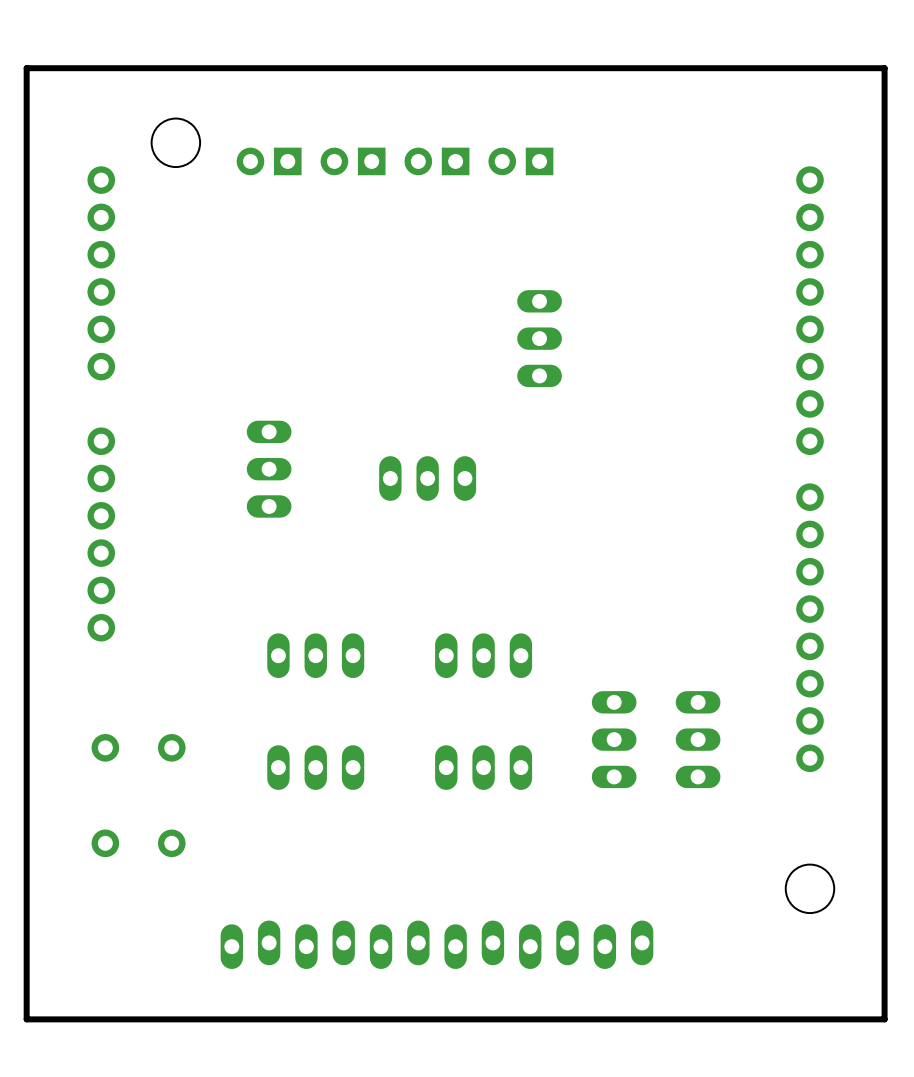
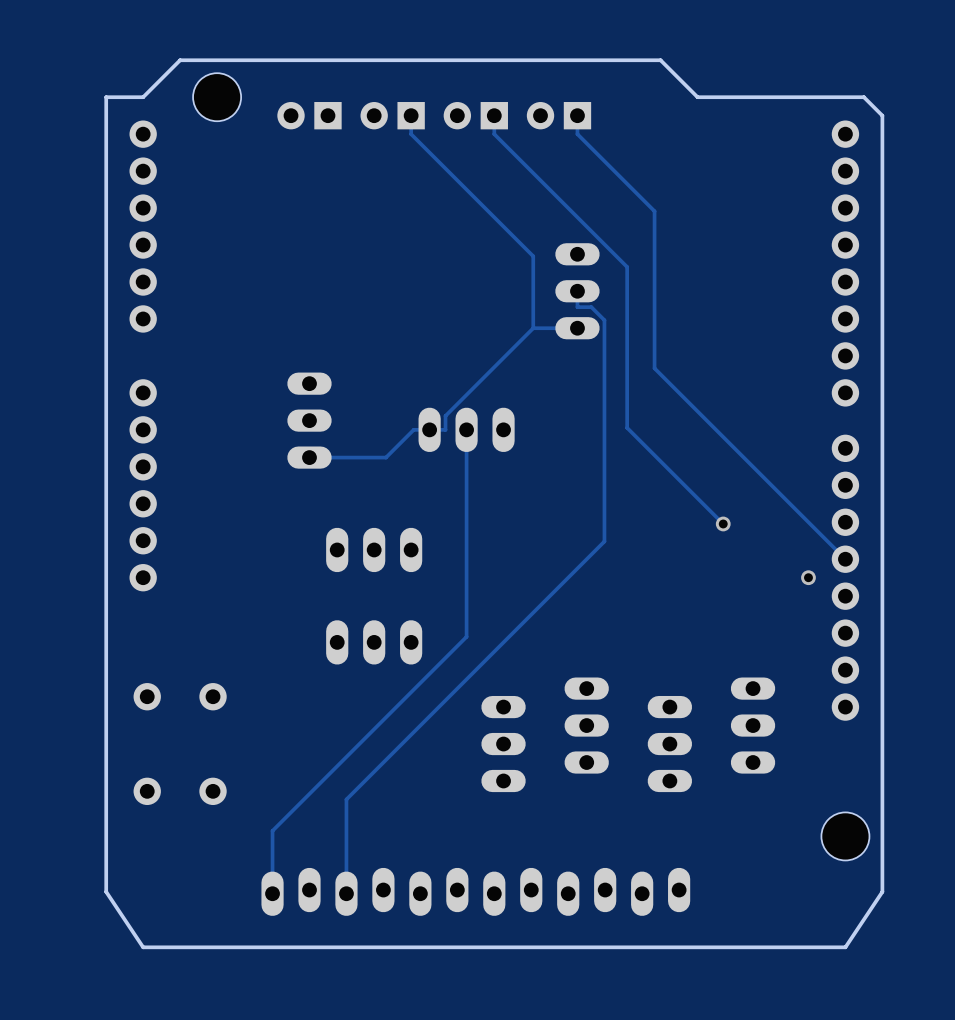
board edge: (884, 68) (26, 68) (26, 1019) (884, 1019) (884, 68) -> (660, 60) (697, 97) (863, 97) (882, 115) (882, 891) (845, 947) (143, 947) (106, 891) (106, 97) (143, 97) (180, 60) (660, 60)
track: none -> (411, 115) (411, 134) (533, 256) (533, 328)
track: none -> (494, 115) (494, 134) (627, 267) (627, 427) (723, 523)
track: none -> (577, 115) (577, 134) (654, 211) (654, 368) (845, 559)
track: none -> (577, 291) (577, 307) (591, 307) (604, 320) (604, 541) (346, 799) (346, 893)
track: none -> (533, 328) (445, 415) (445, 429) (413, 429) (386, 457) (309, 457)
track: none -> (577, 328) (533, 328)
track: none -> (466, 429) (466, 636) (272, 830) (272, 893)
via: none -> (723, 523)
part: none -> (374, 549)
via: none -> (808, 577)
part: (315, 655) -> none
part: (483, 655) -> none
part: none -> (374, 642)
part: (614, 739) -> none
part position: (698, 739) -> (753, 725)
part: (315, 767) -> none
part: (483, 767) -> none
part: none -> (586, 725)
part: none -> (503, 744)
part: none -> (669, 744)

